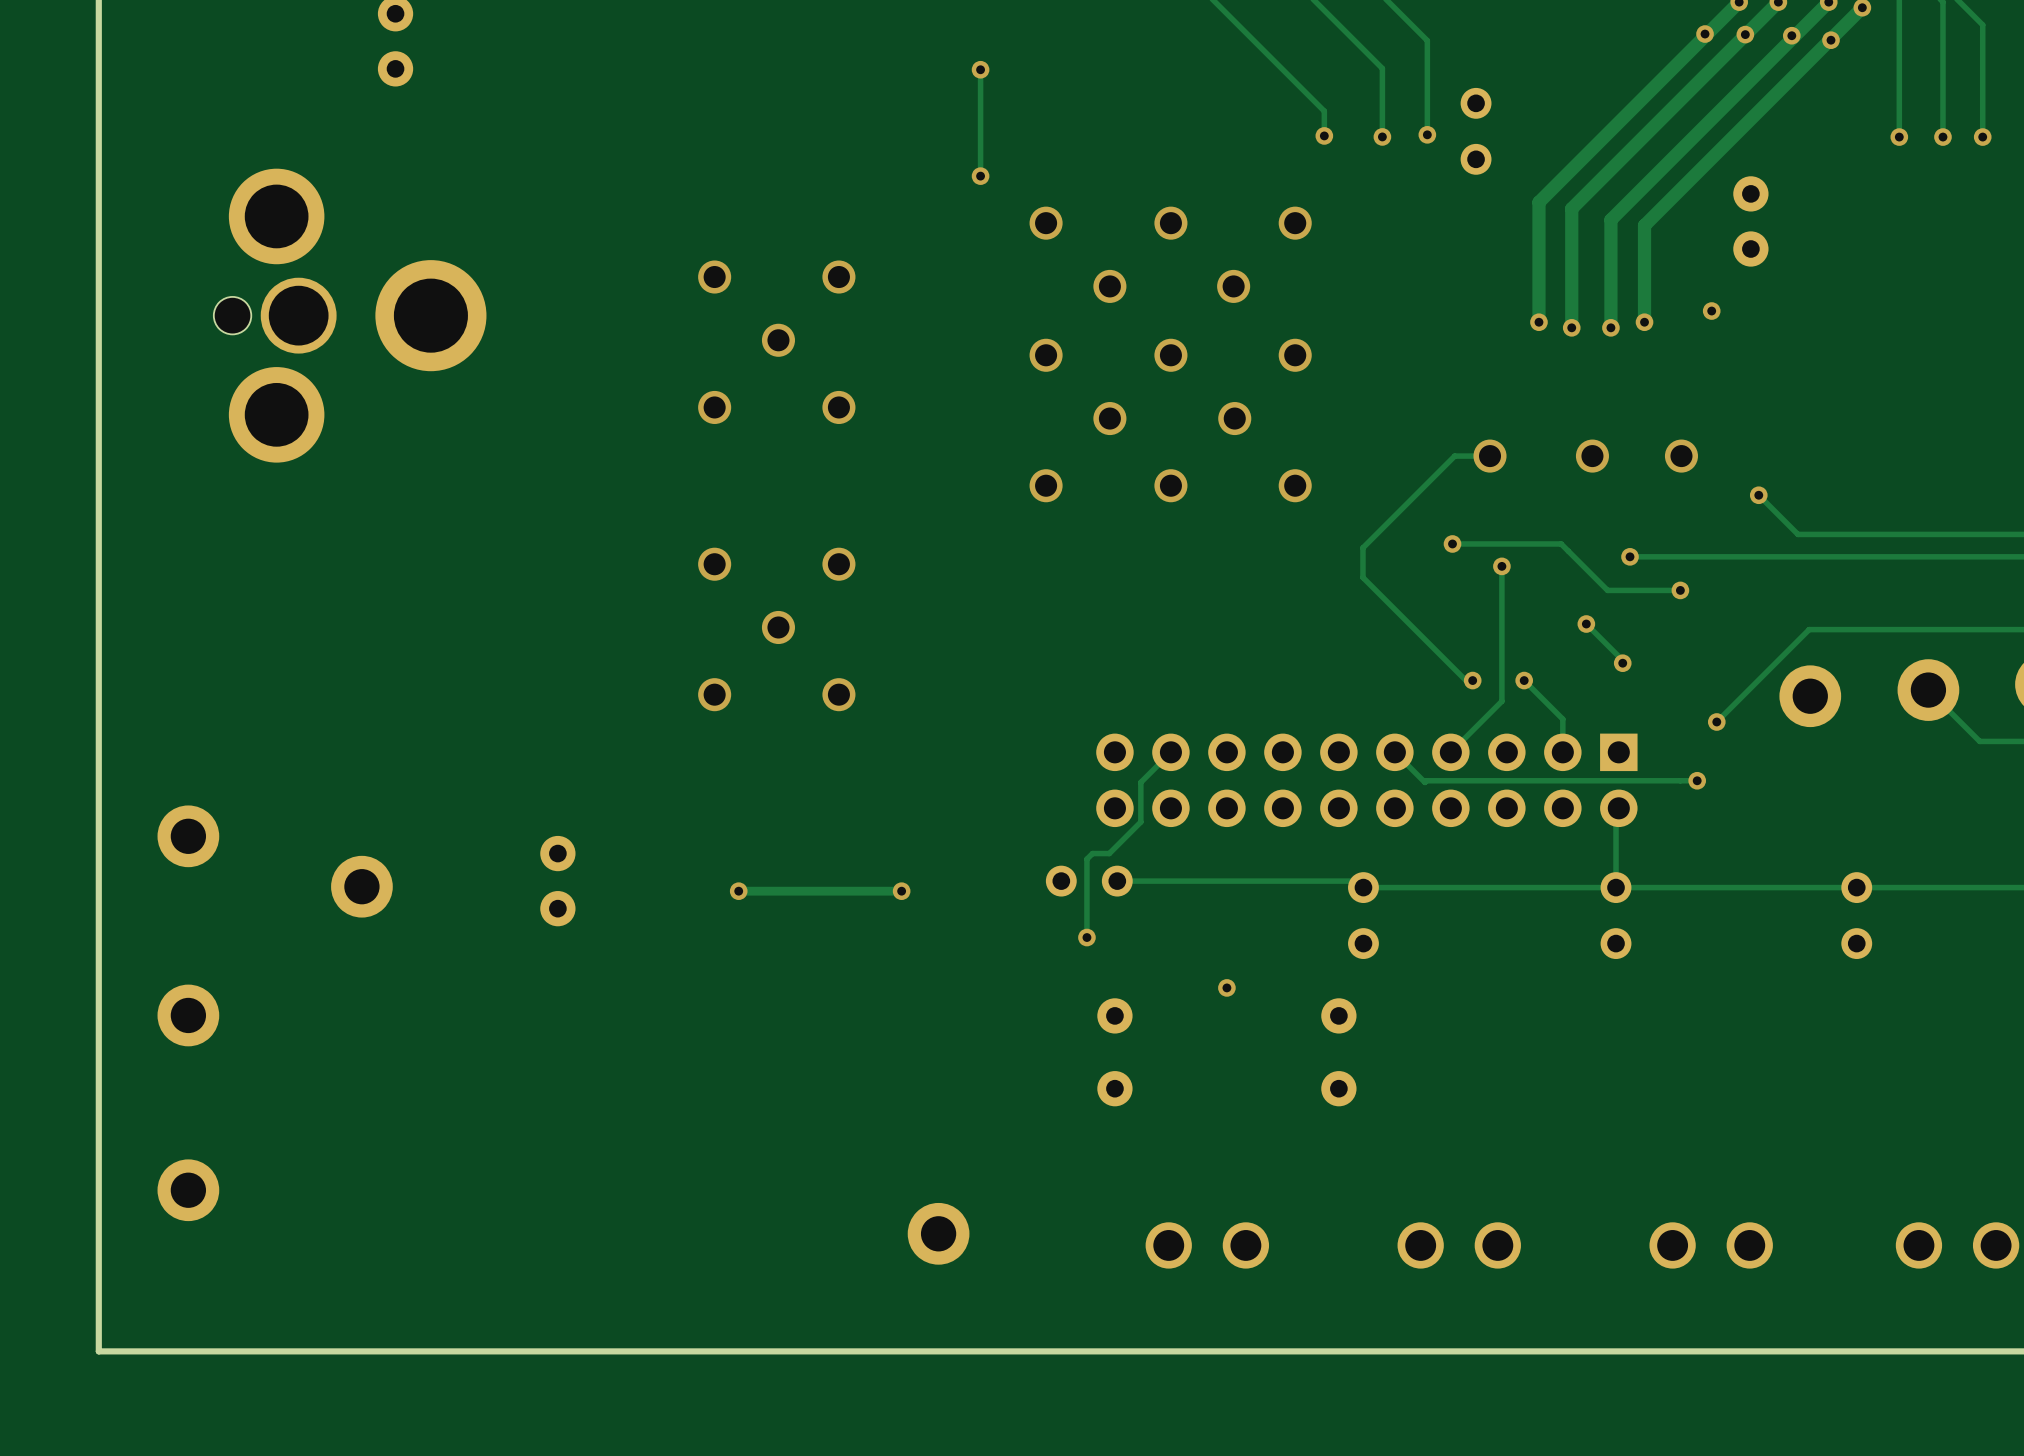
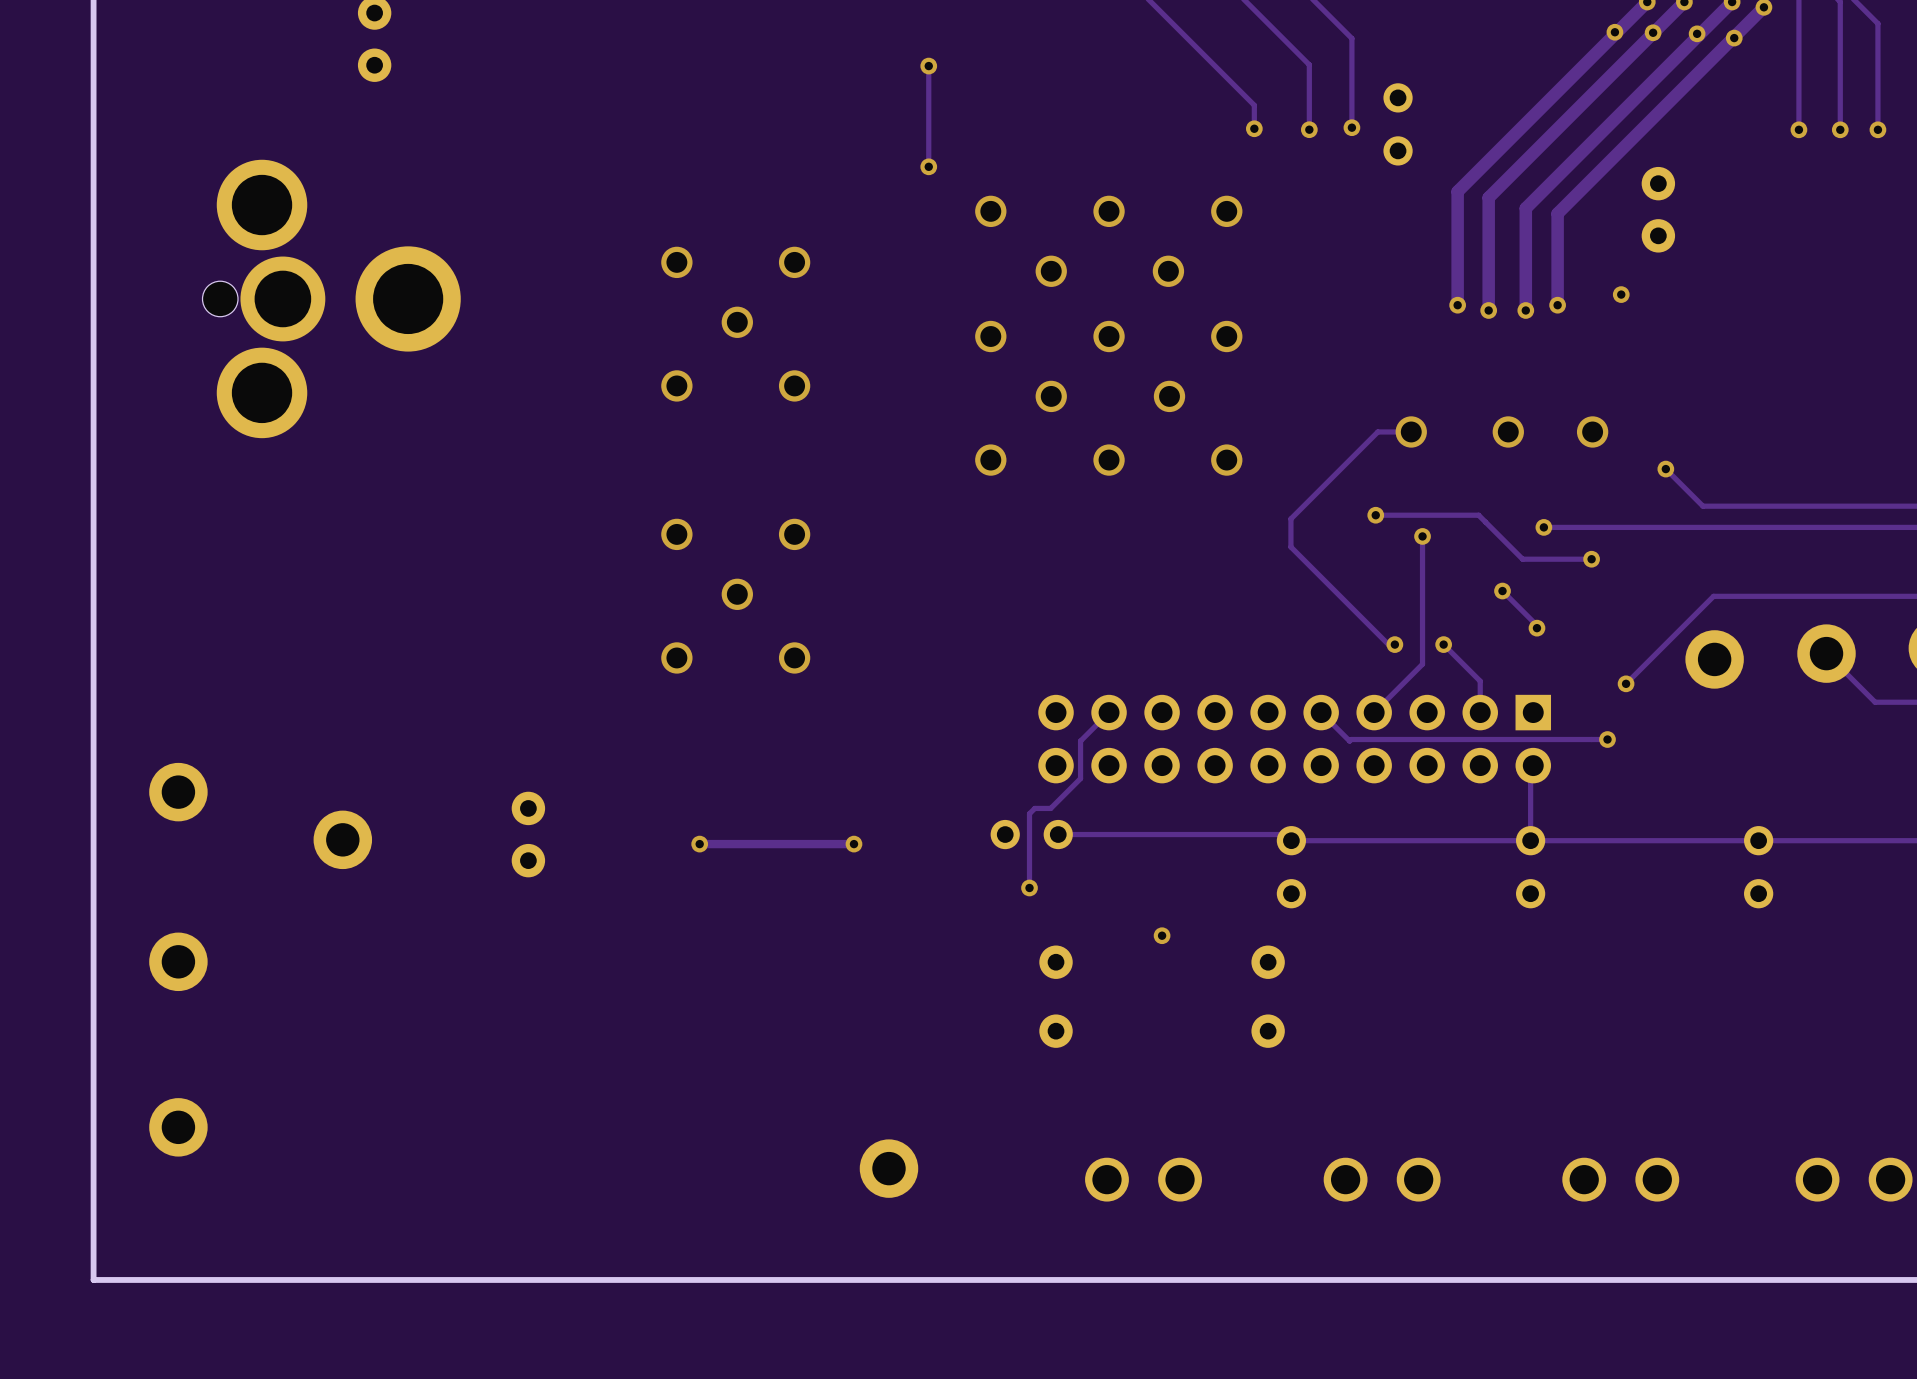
part footprint: [213, 168, 487, 463] -> [202, 159, 461, 439]

